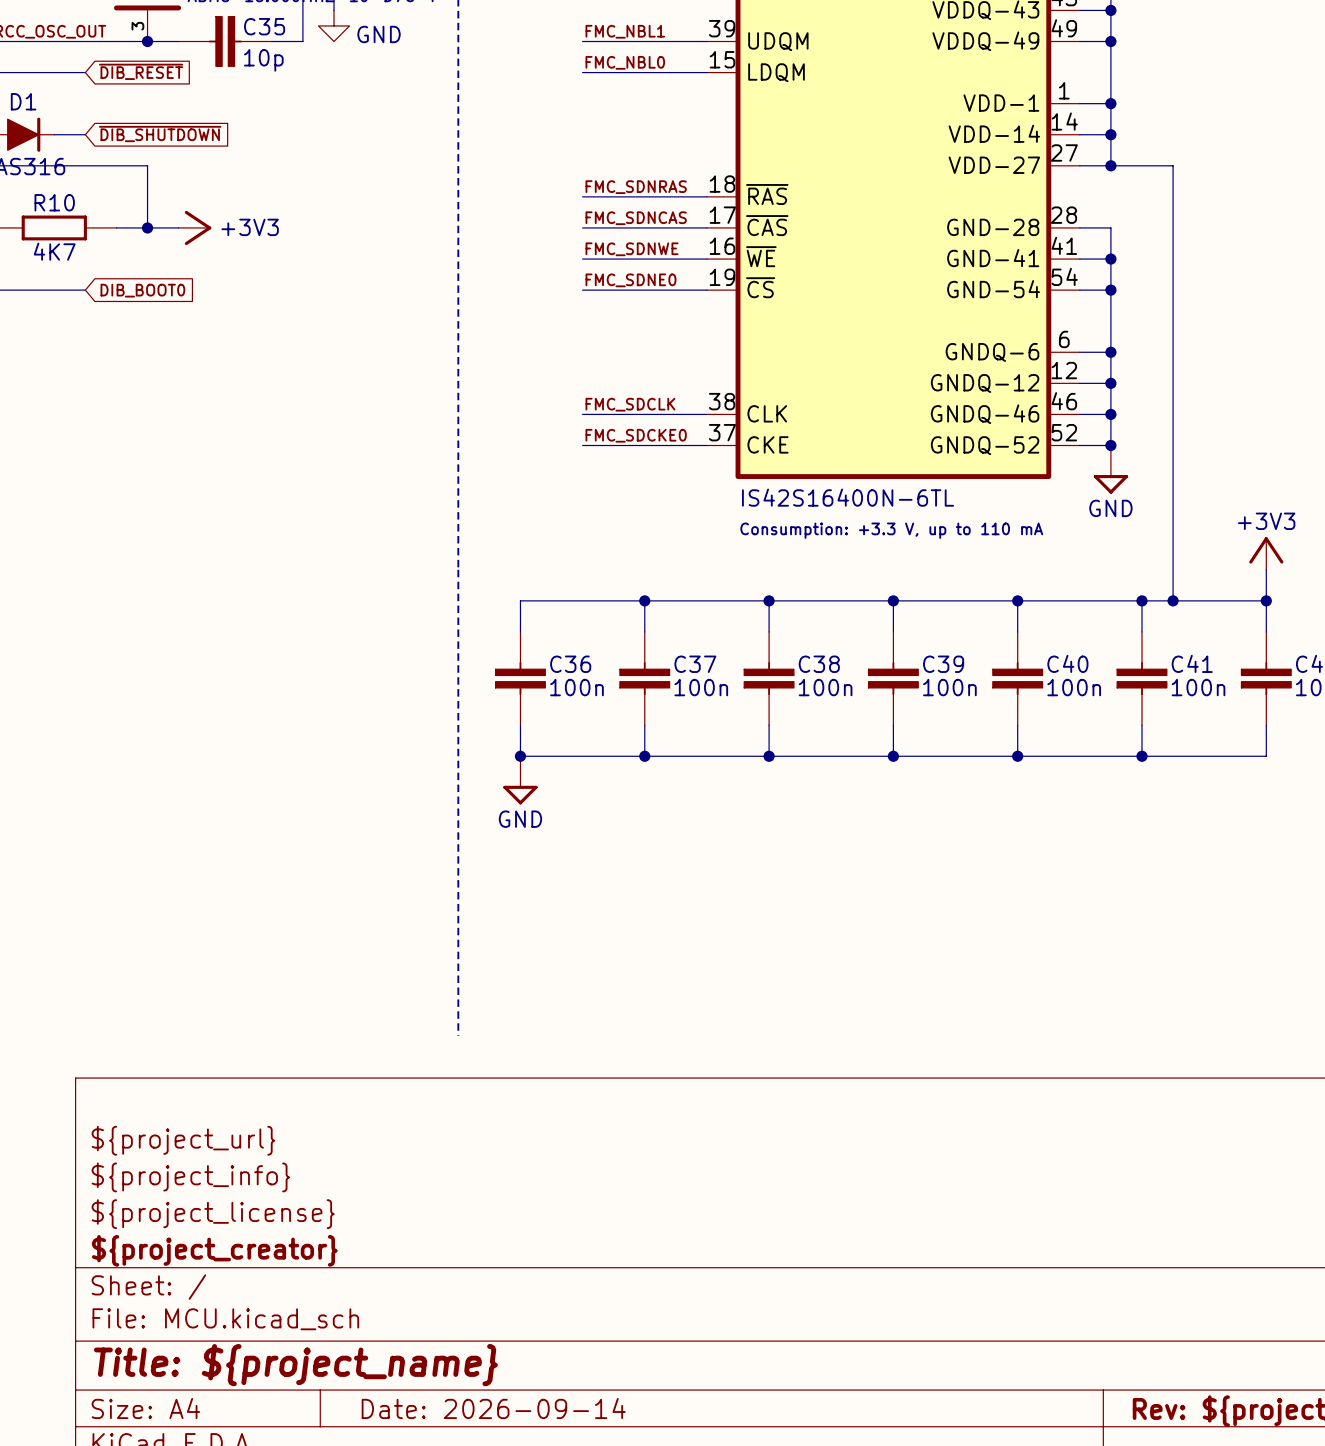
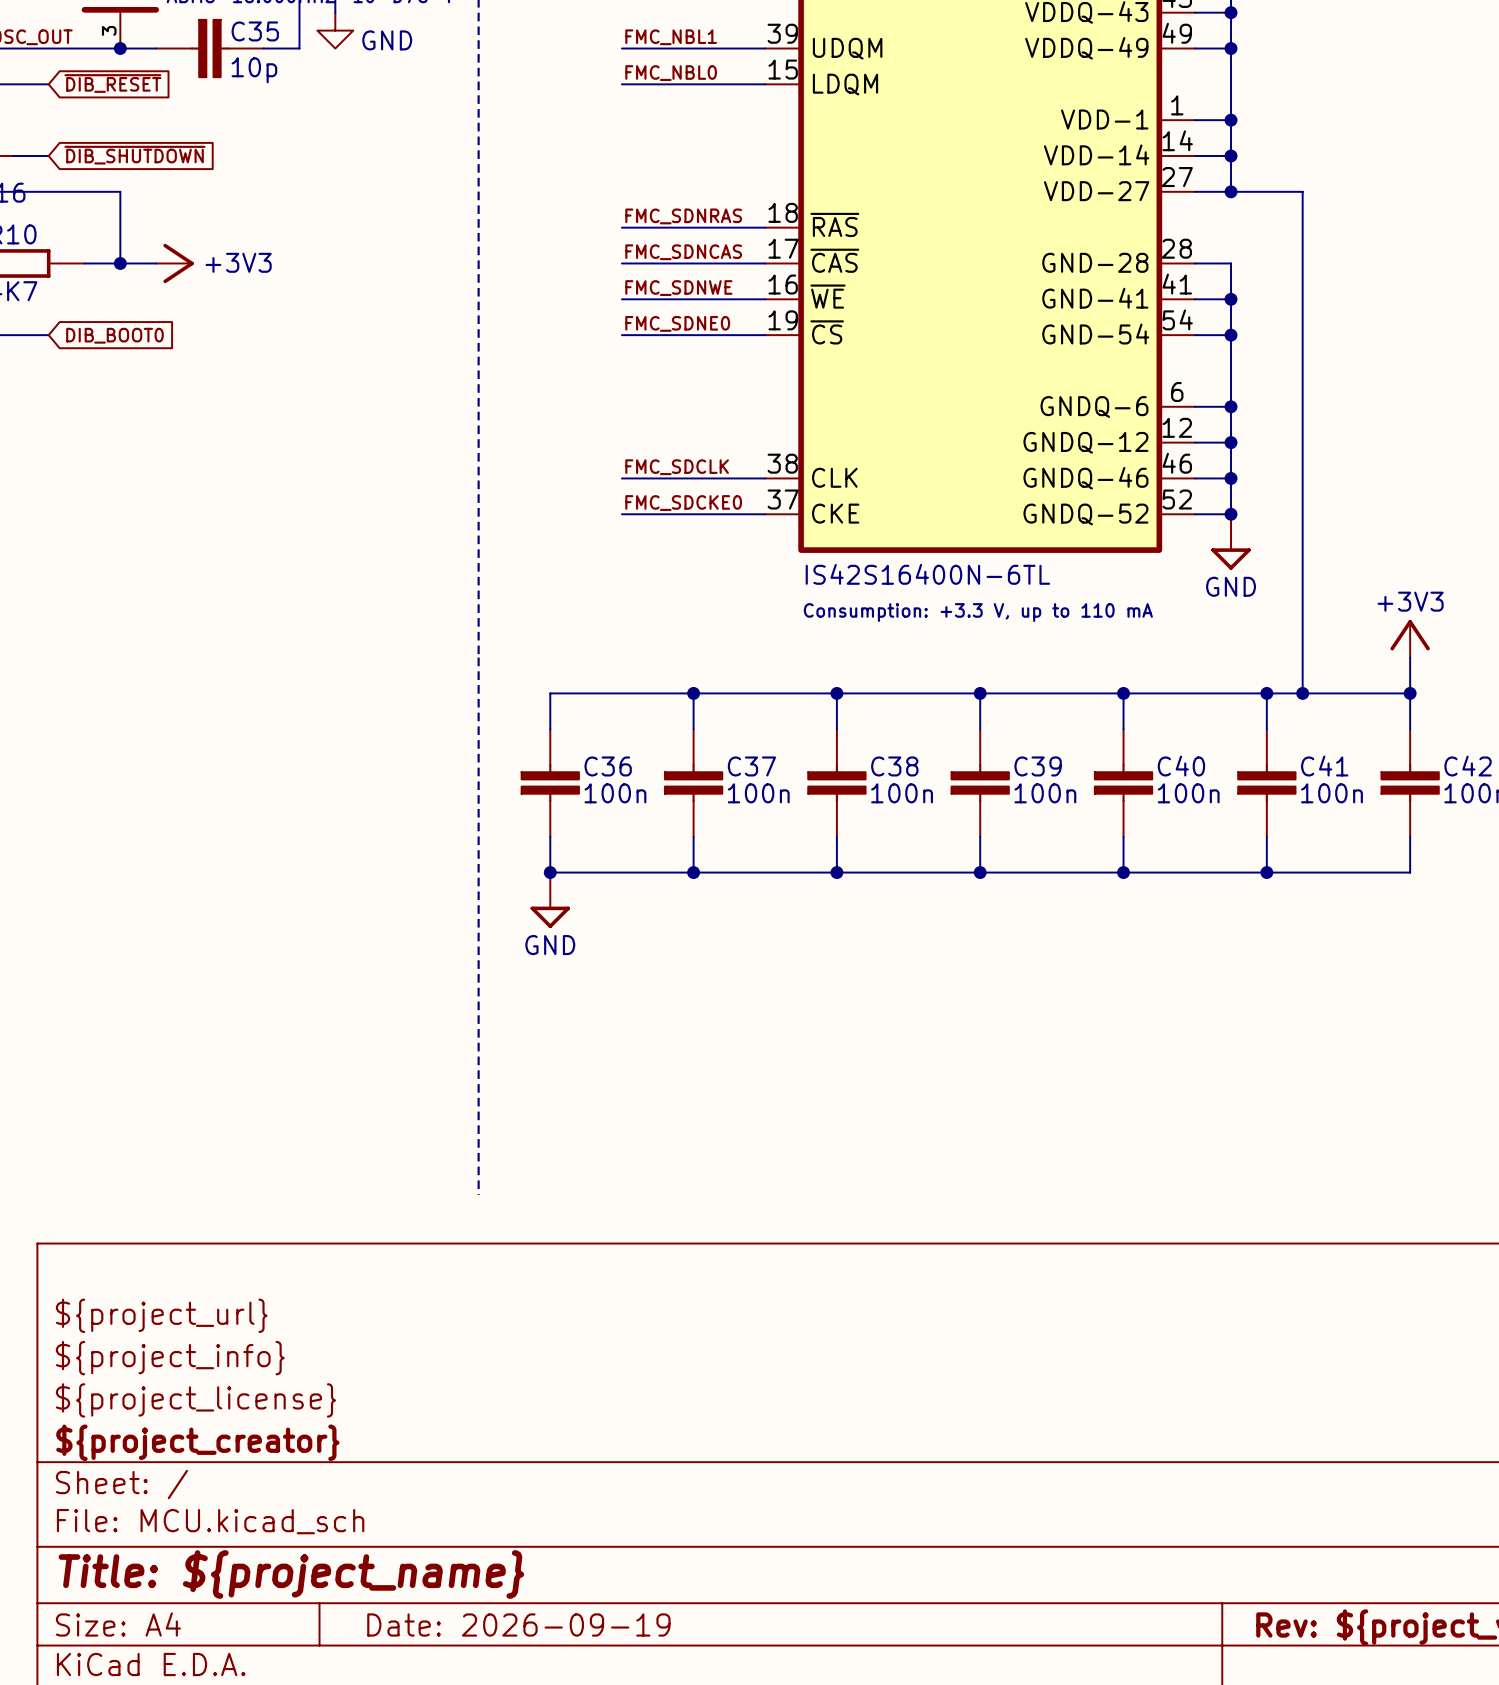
title block: Date: 2026-09-14 (493, 1408) -> Date: 2026-09-19 (518, 1625)

